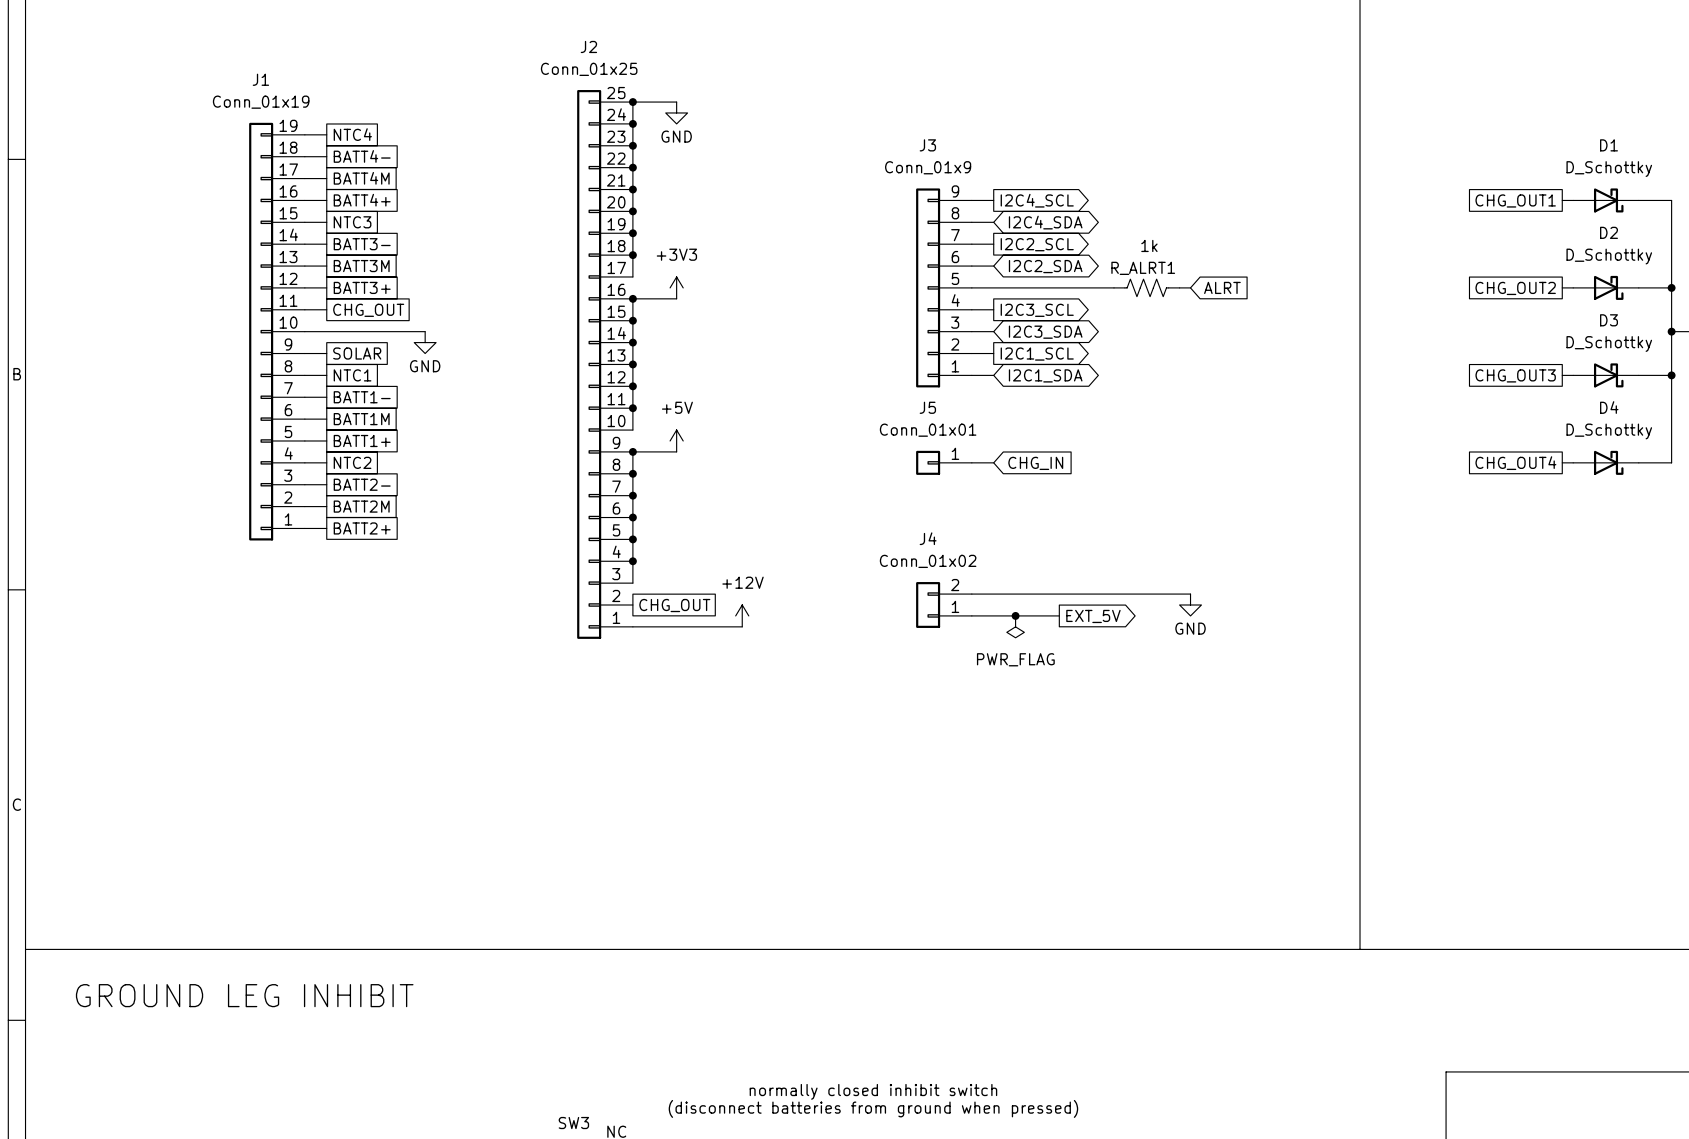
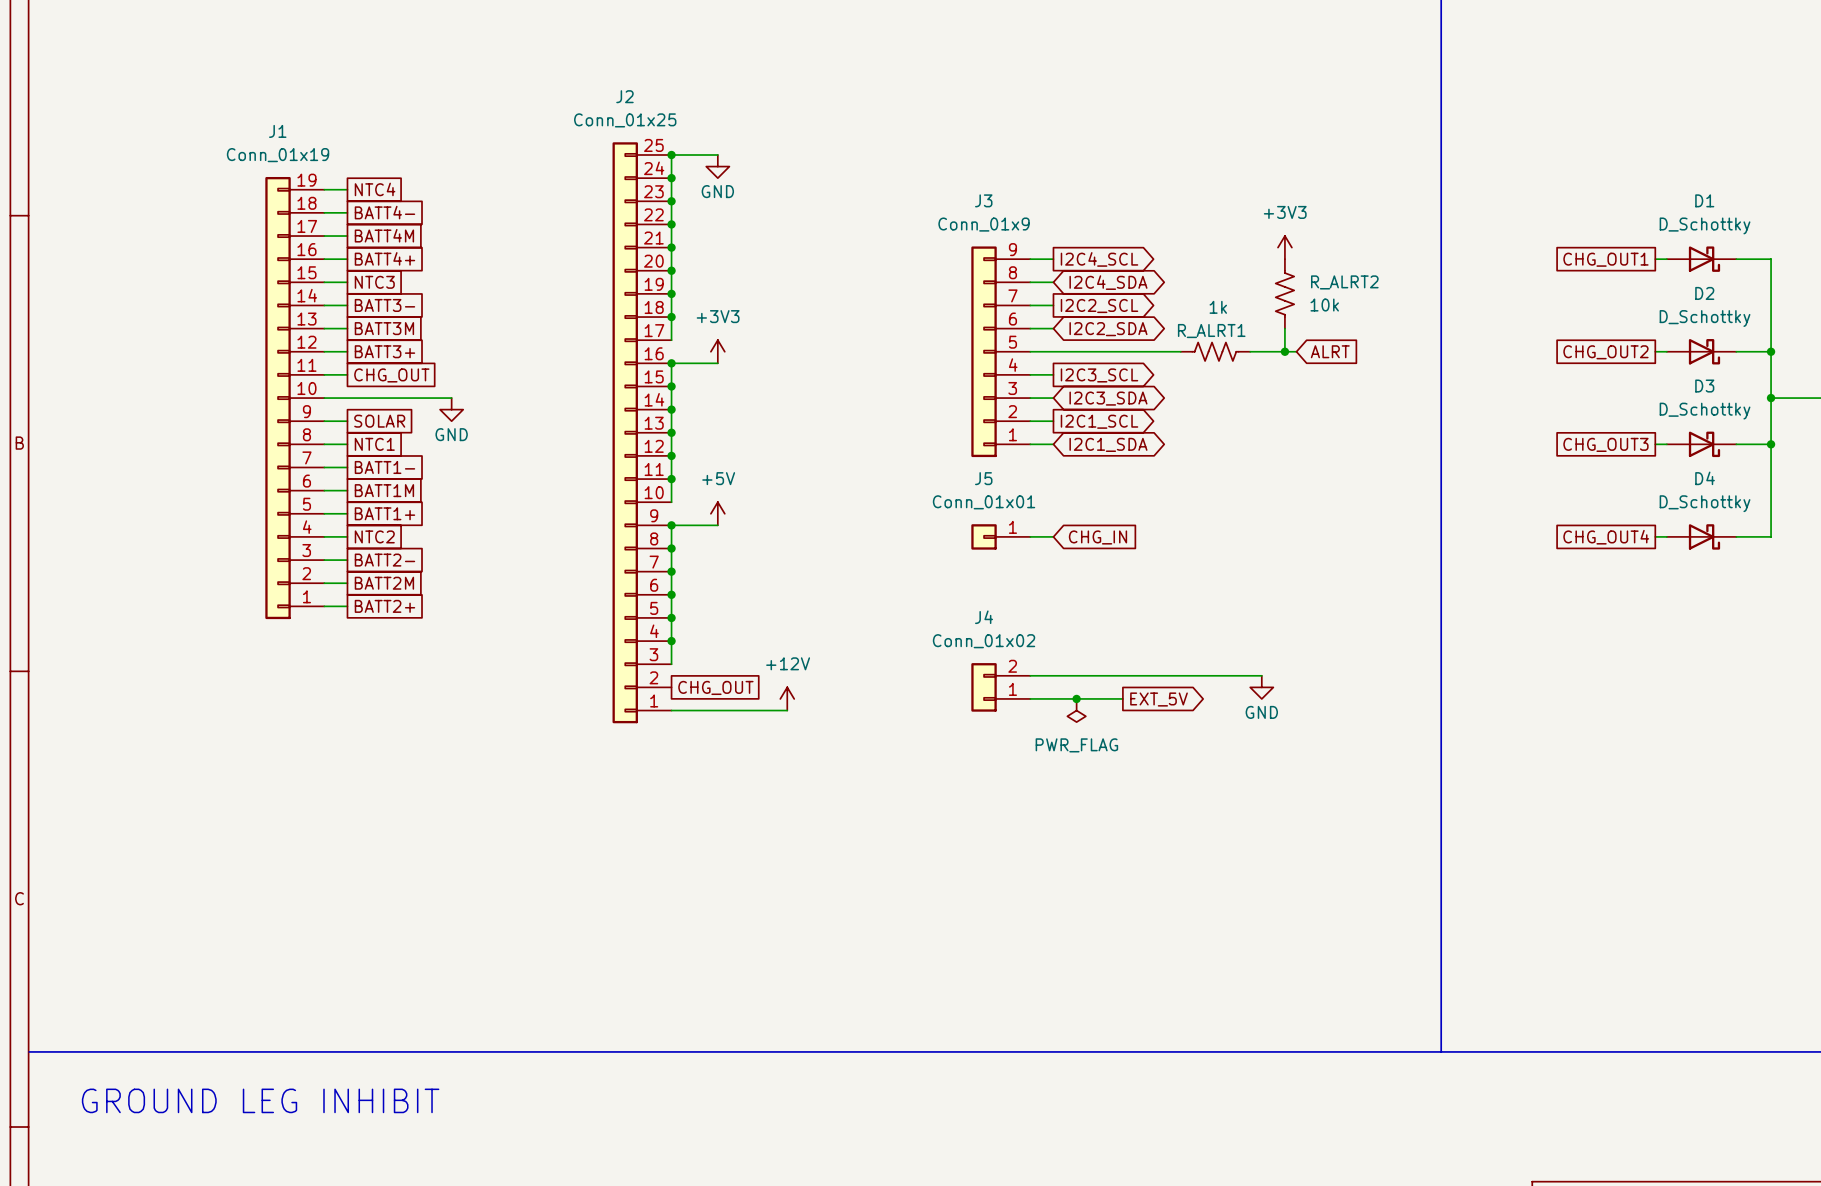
power symbol: none -> +3V3 (1284, 247)
R_ALRT2: none -> 10k (1284, 293)
wire: none -> (1284, 328) (1284, 351)
wire: none -> (1261, 351) (1296, 351)
junction: none -> (1284, 351)
global label position: ALRT (1222, 287) -> ALRT (1330, 351)

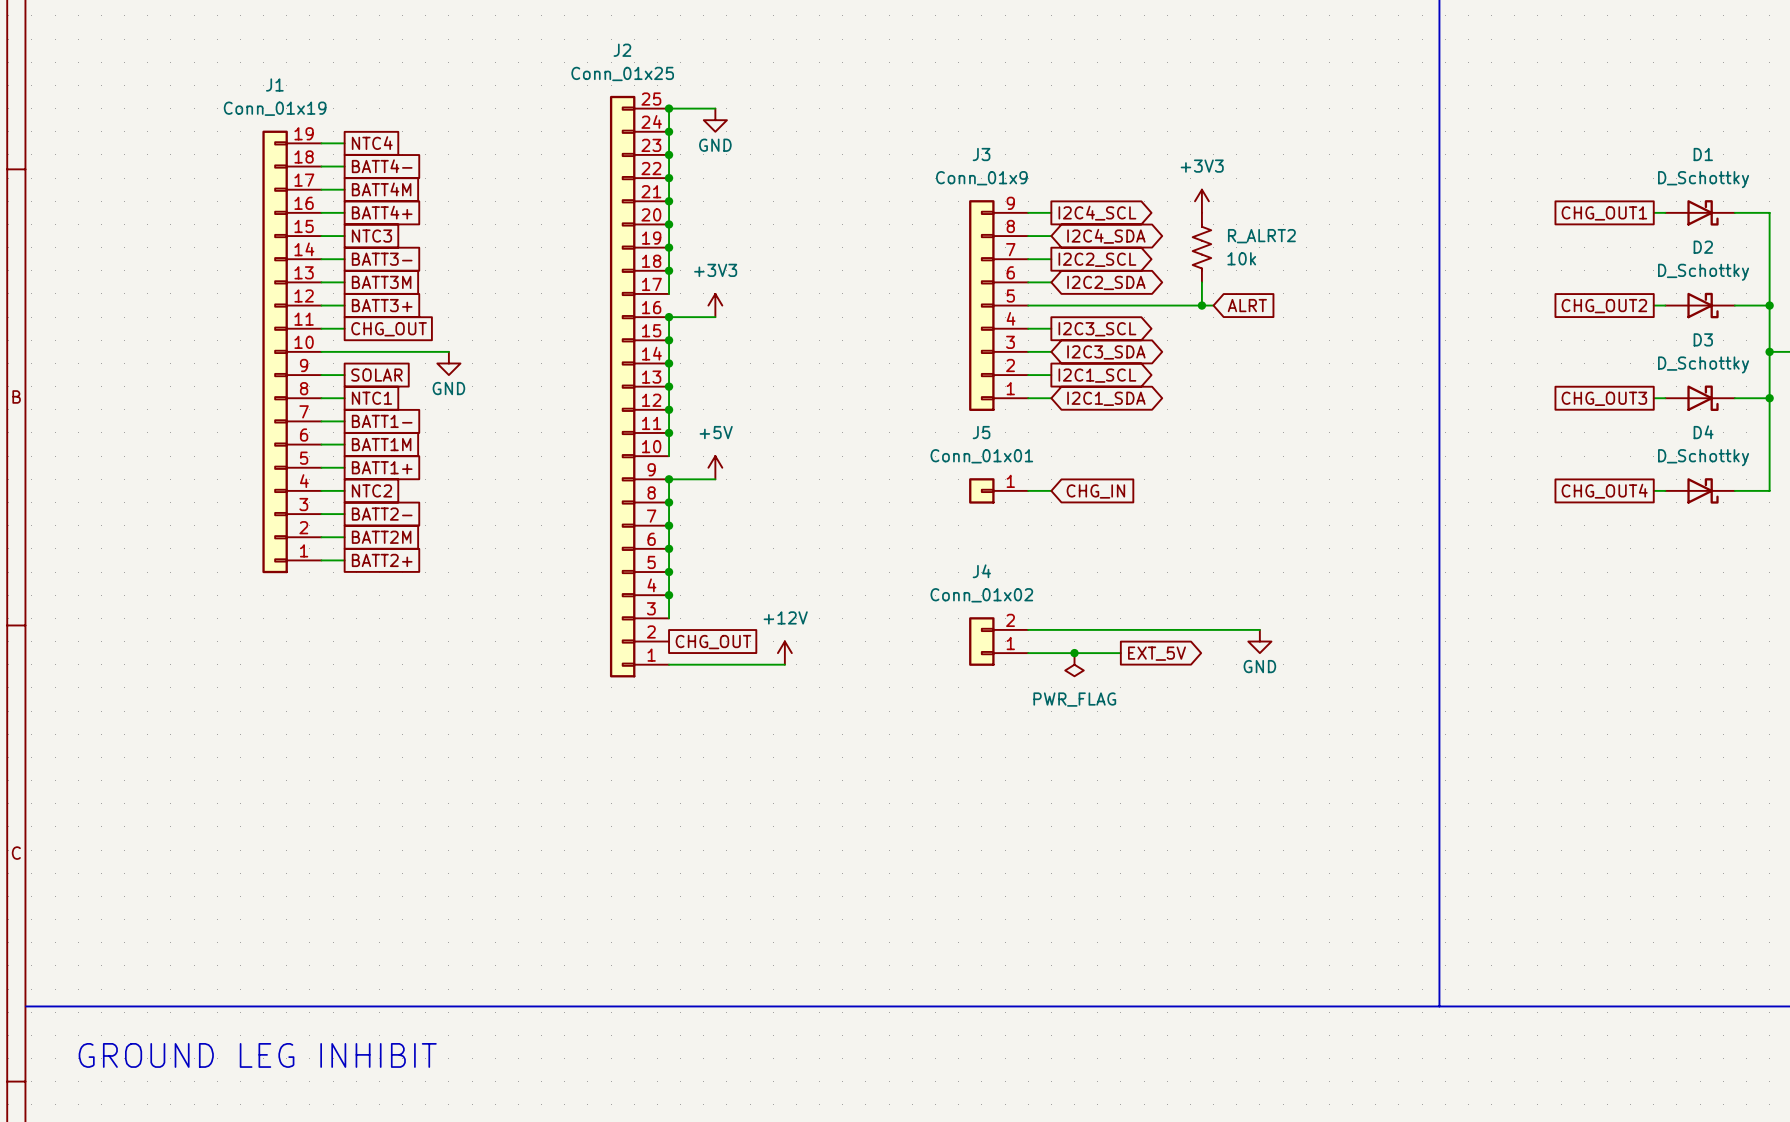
power symbol position: +3V3 (1284, 247) -> +3V3 (1201, 201)
R_ALRT2 position: (1284, 293) -> (1201, 247)
wire: (1284, 328) (1284, 351) -> (1201, 282) (1201, 305)
junction: none -> (1201, 305)
R_ALRT1: 1k (1215, 351) -> none
wire: (1250, 351) (1296, 351) -> none
junction: (1284, 351) -> none
global label position: ALRT (1330, 351) -> ALRT (1247, 305)

